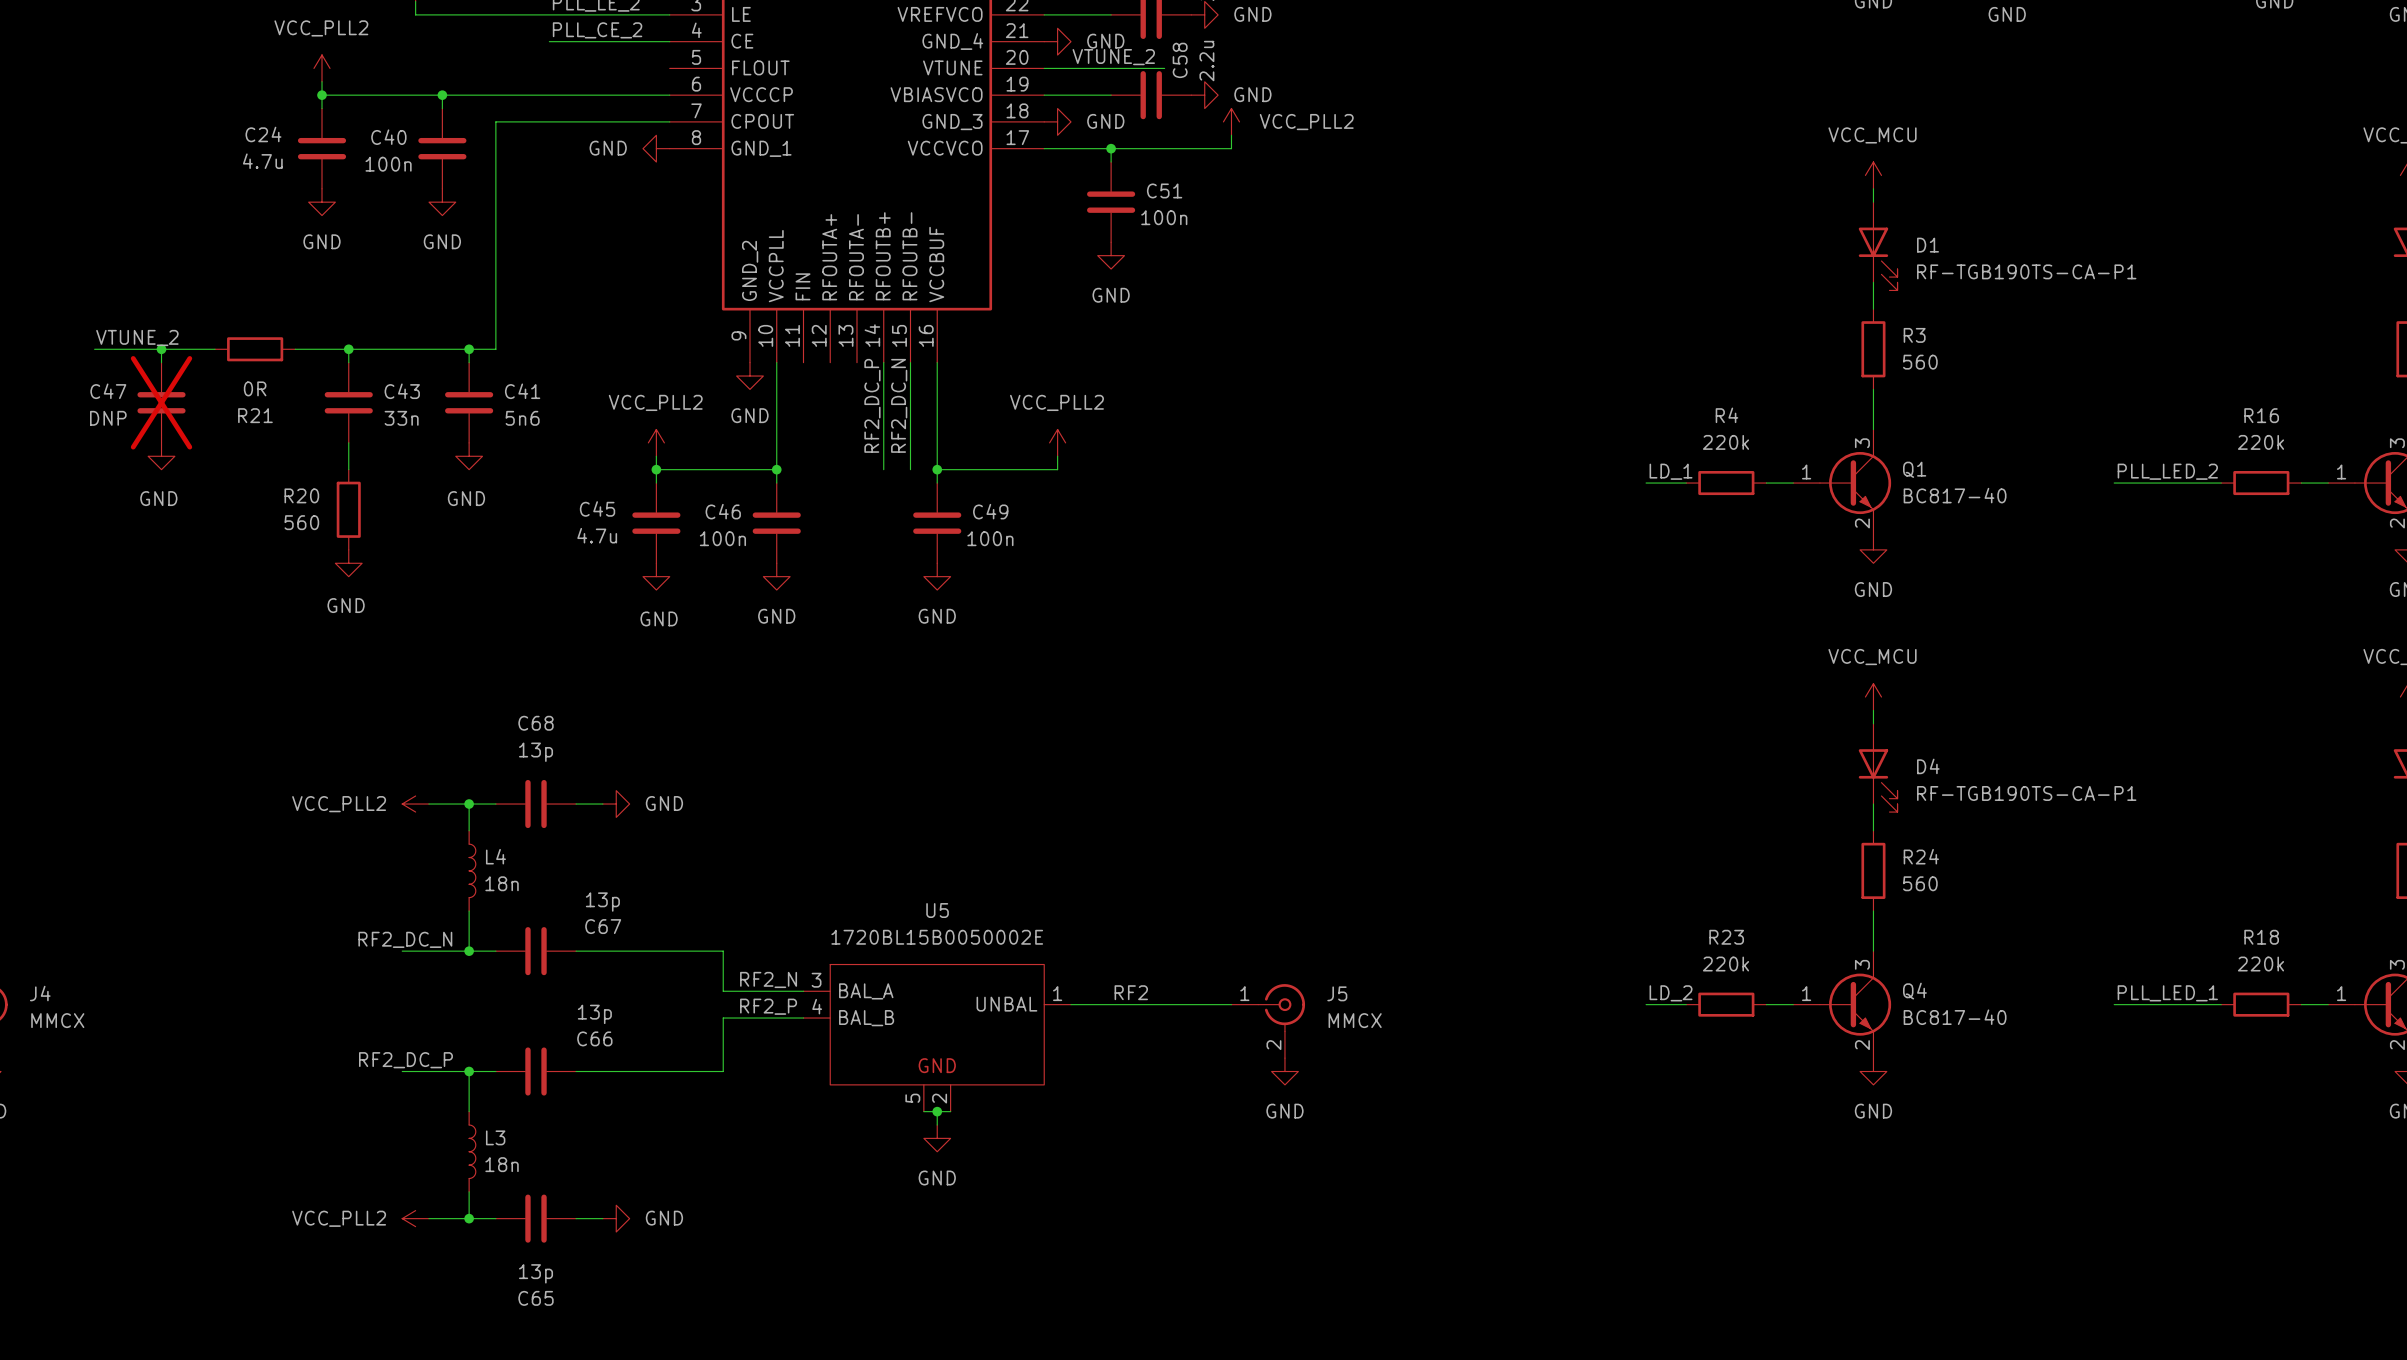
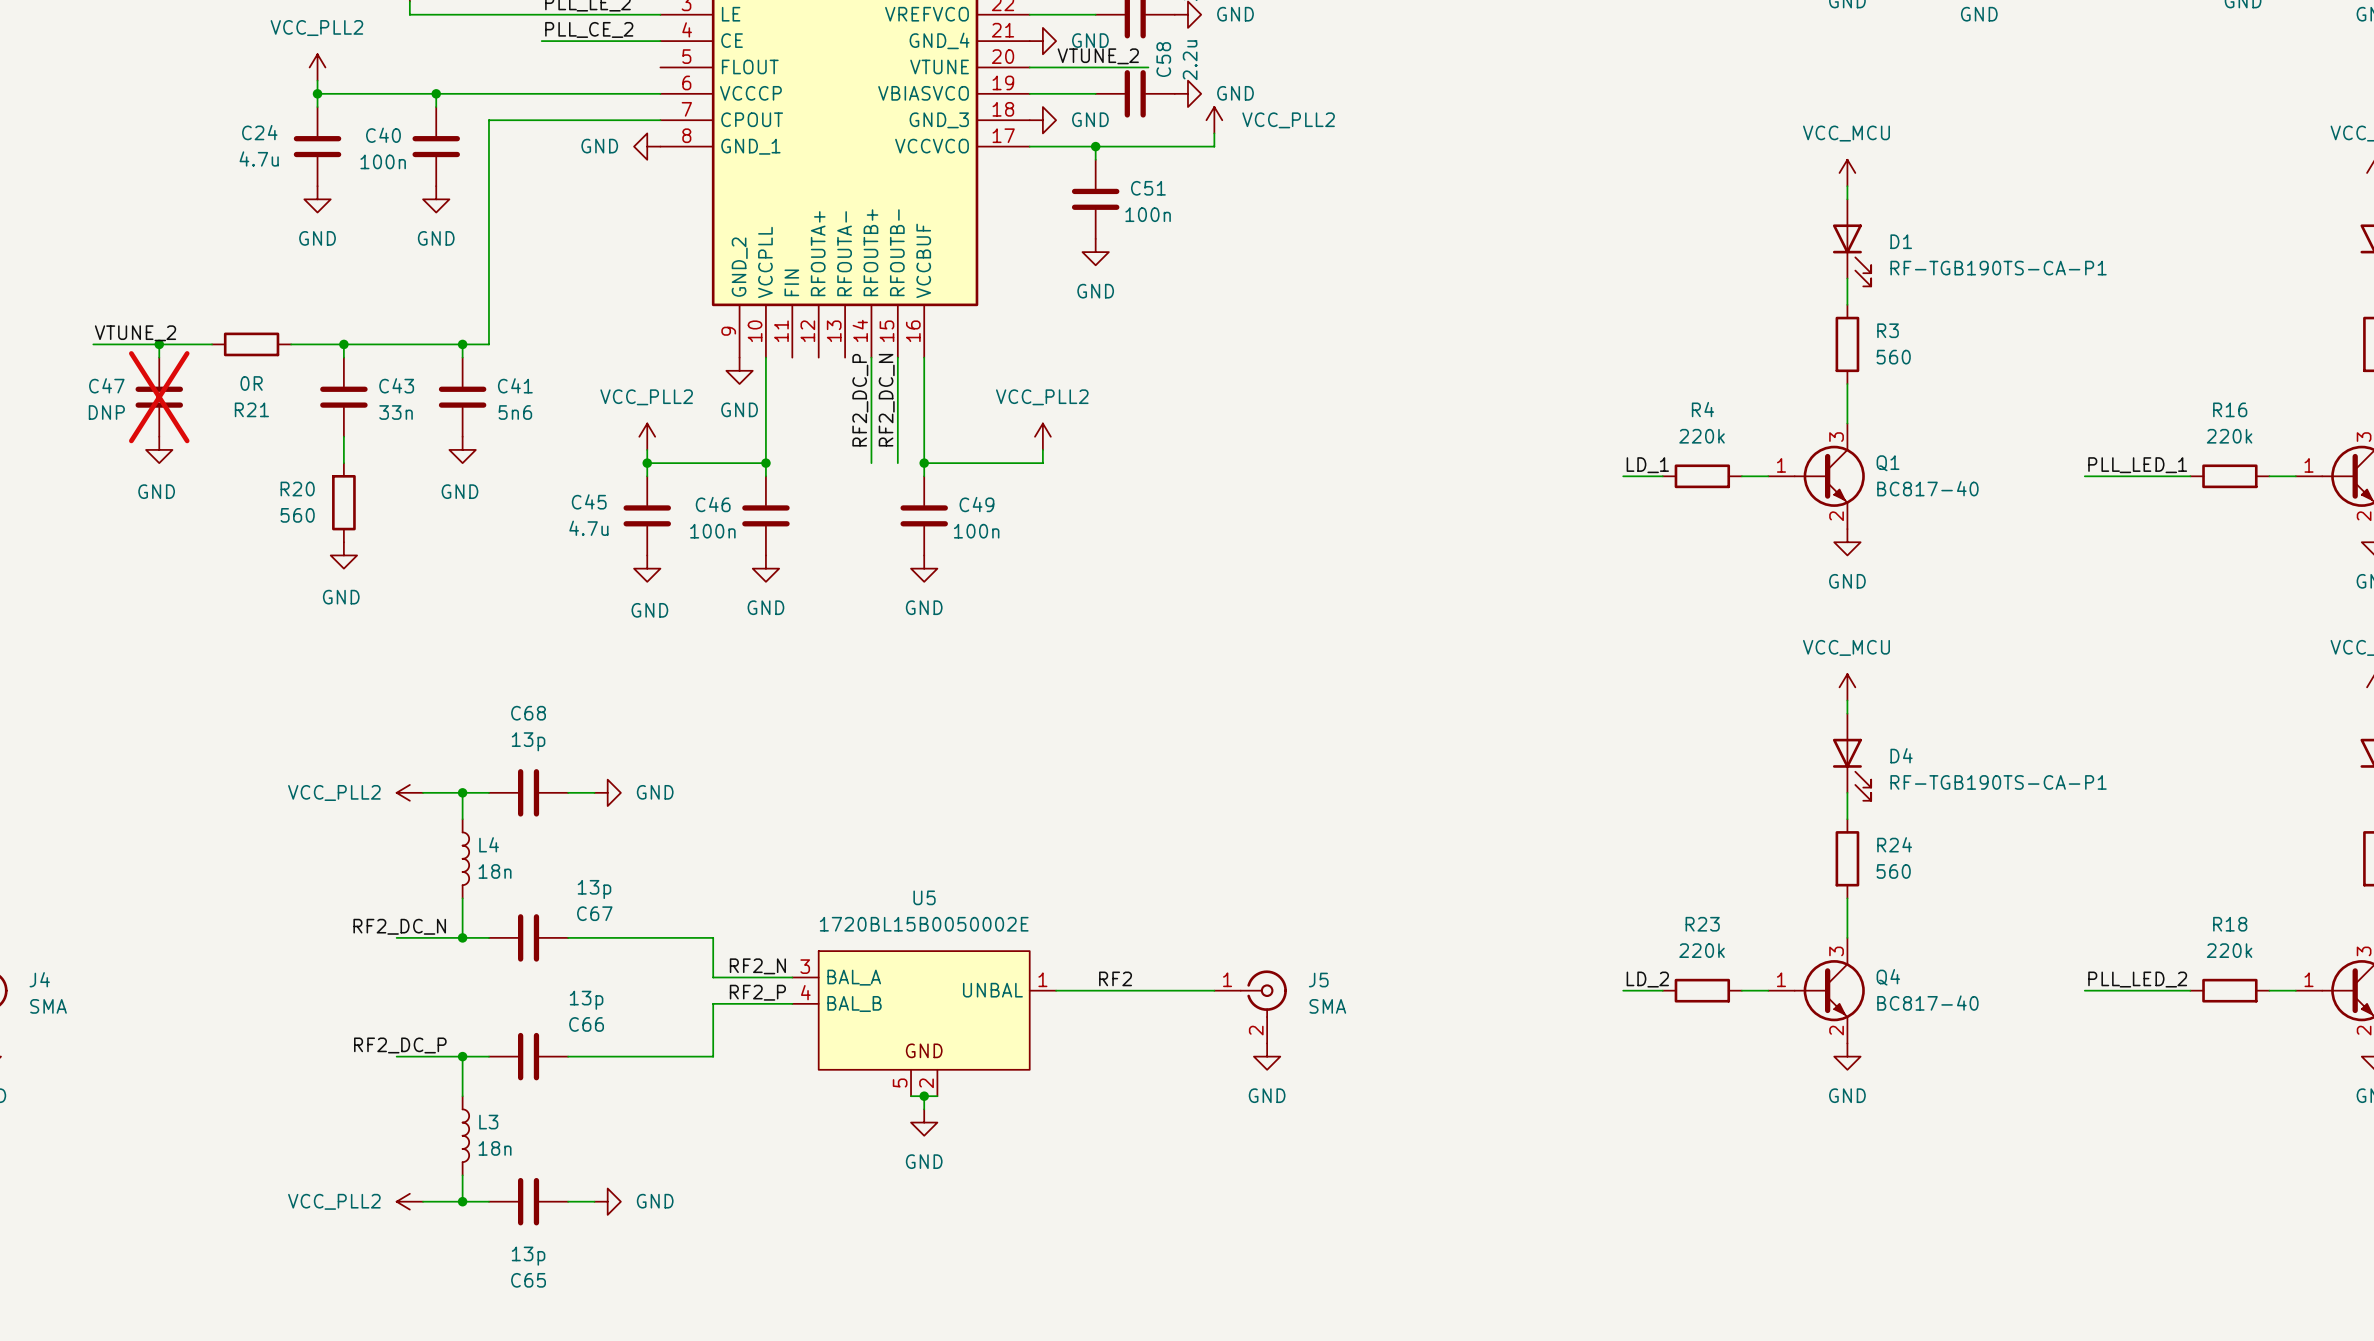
label: PLL_LED_2 (2167, 471) -> PLL_LED_1 (2137, 465)
label: PLL_LED_1 (2167, 993) -> PLL_LED_2 (2137, 979)
J4 value: MMCX (57, 1020) -> SMA (48, 1006)
J5 value: MMCX (1355, 1020) -> SMA (1327, 1006)

